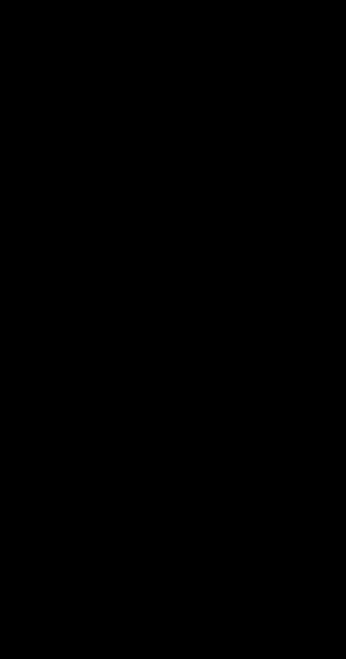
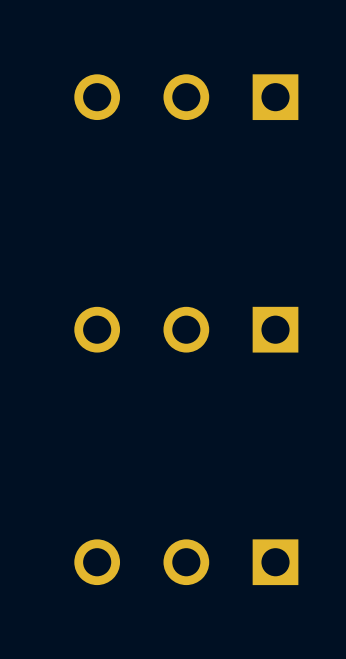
part: none -> (186, 97)
part: none -> (186, 329)
part: none -> (186, 562)

